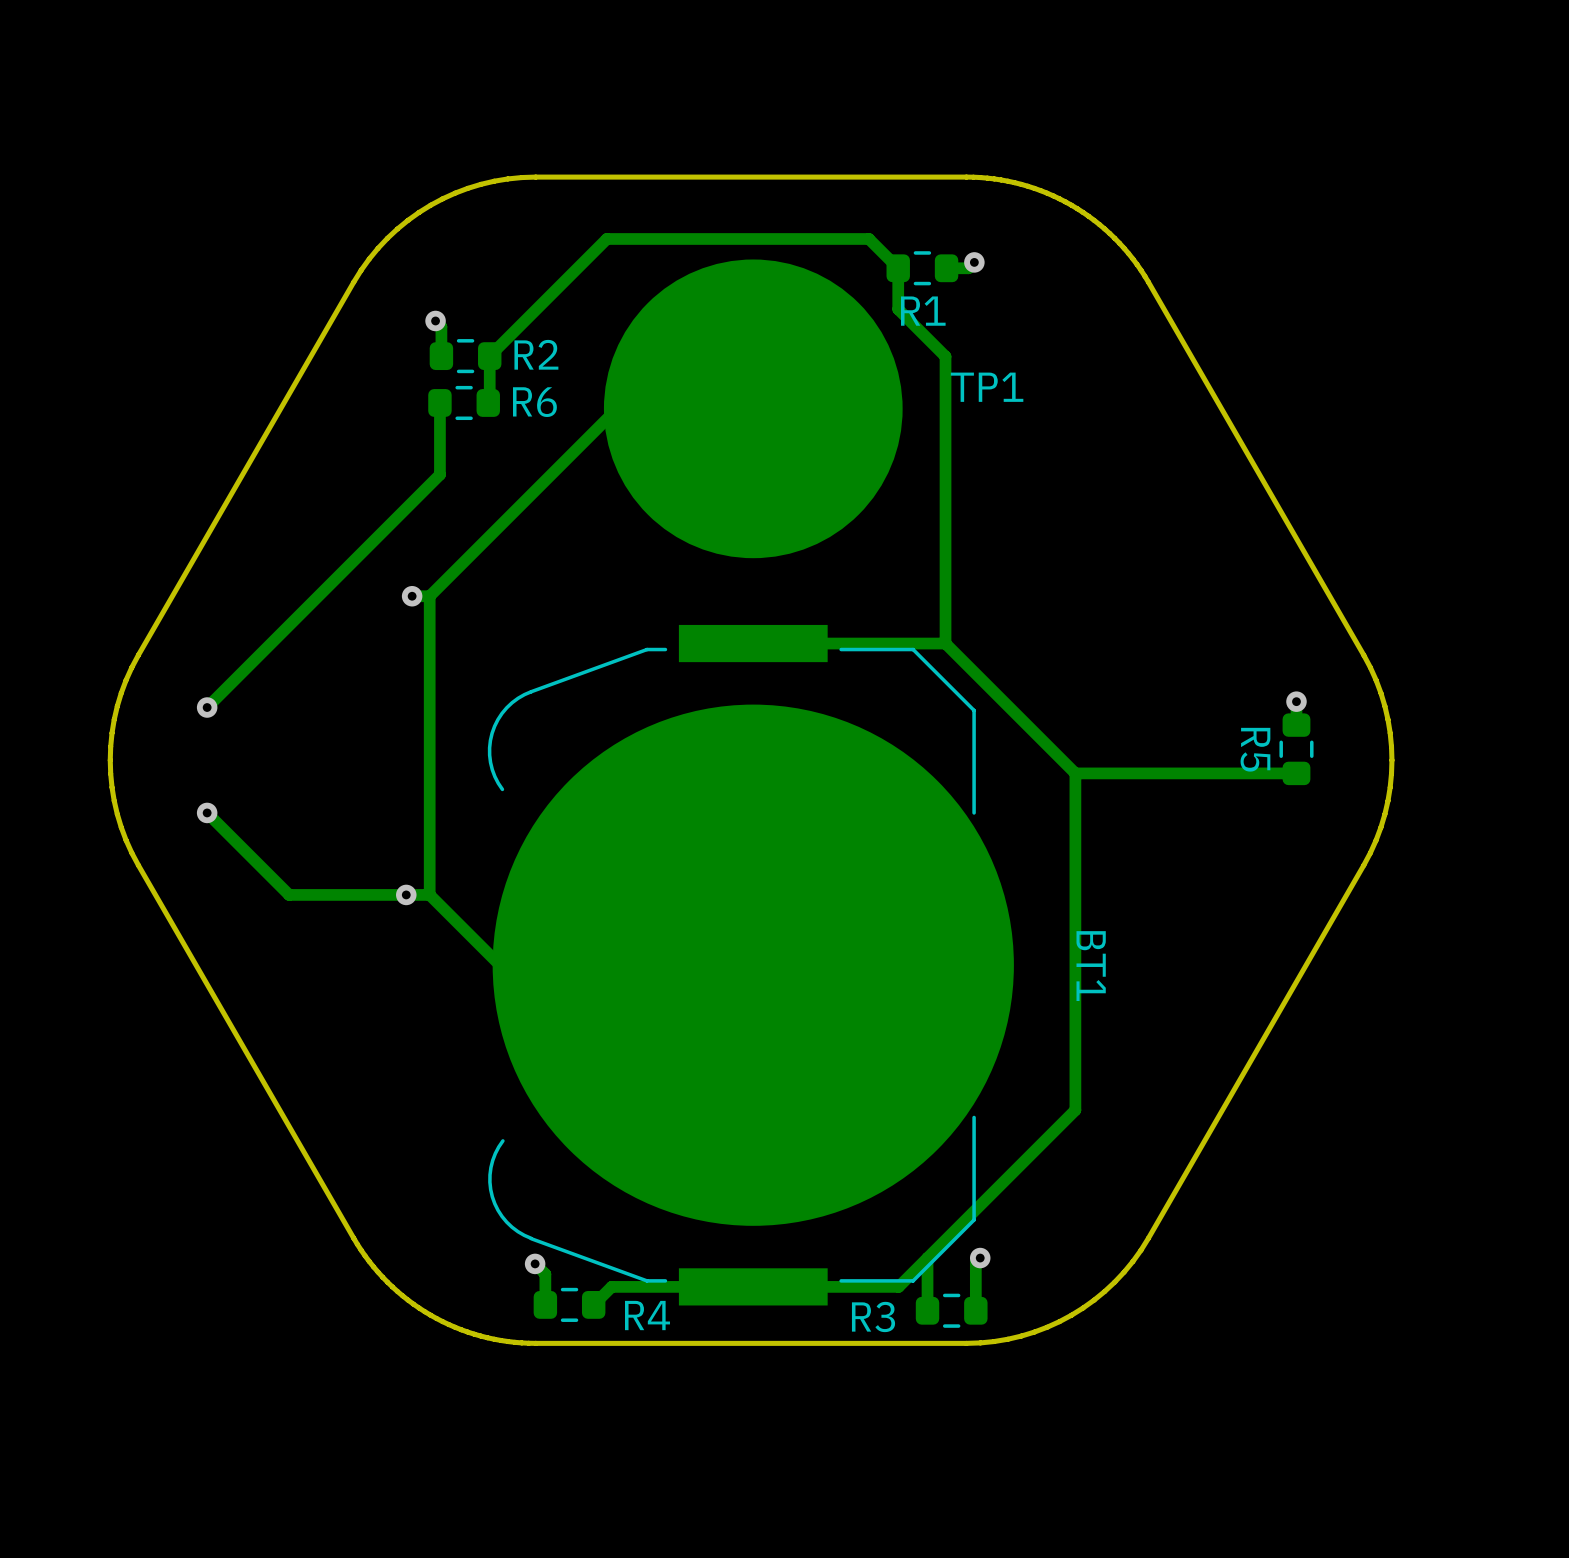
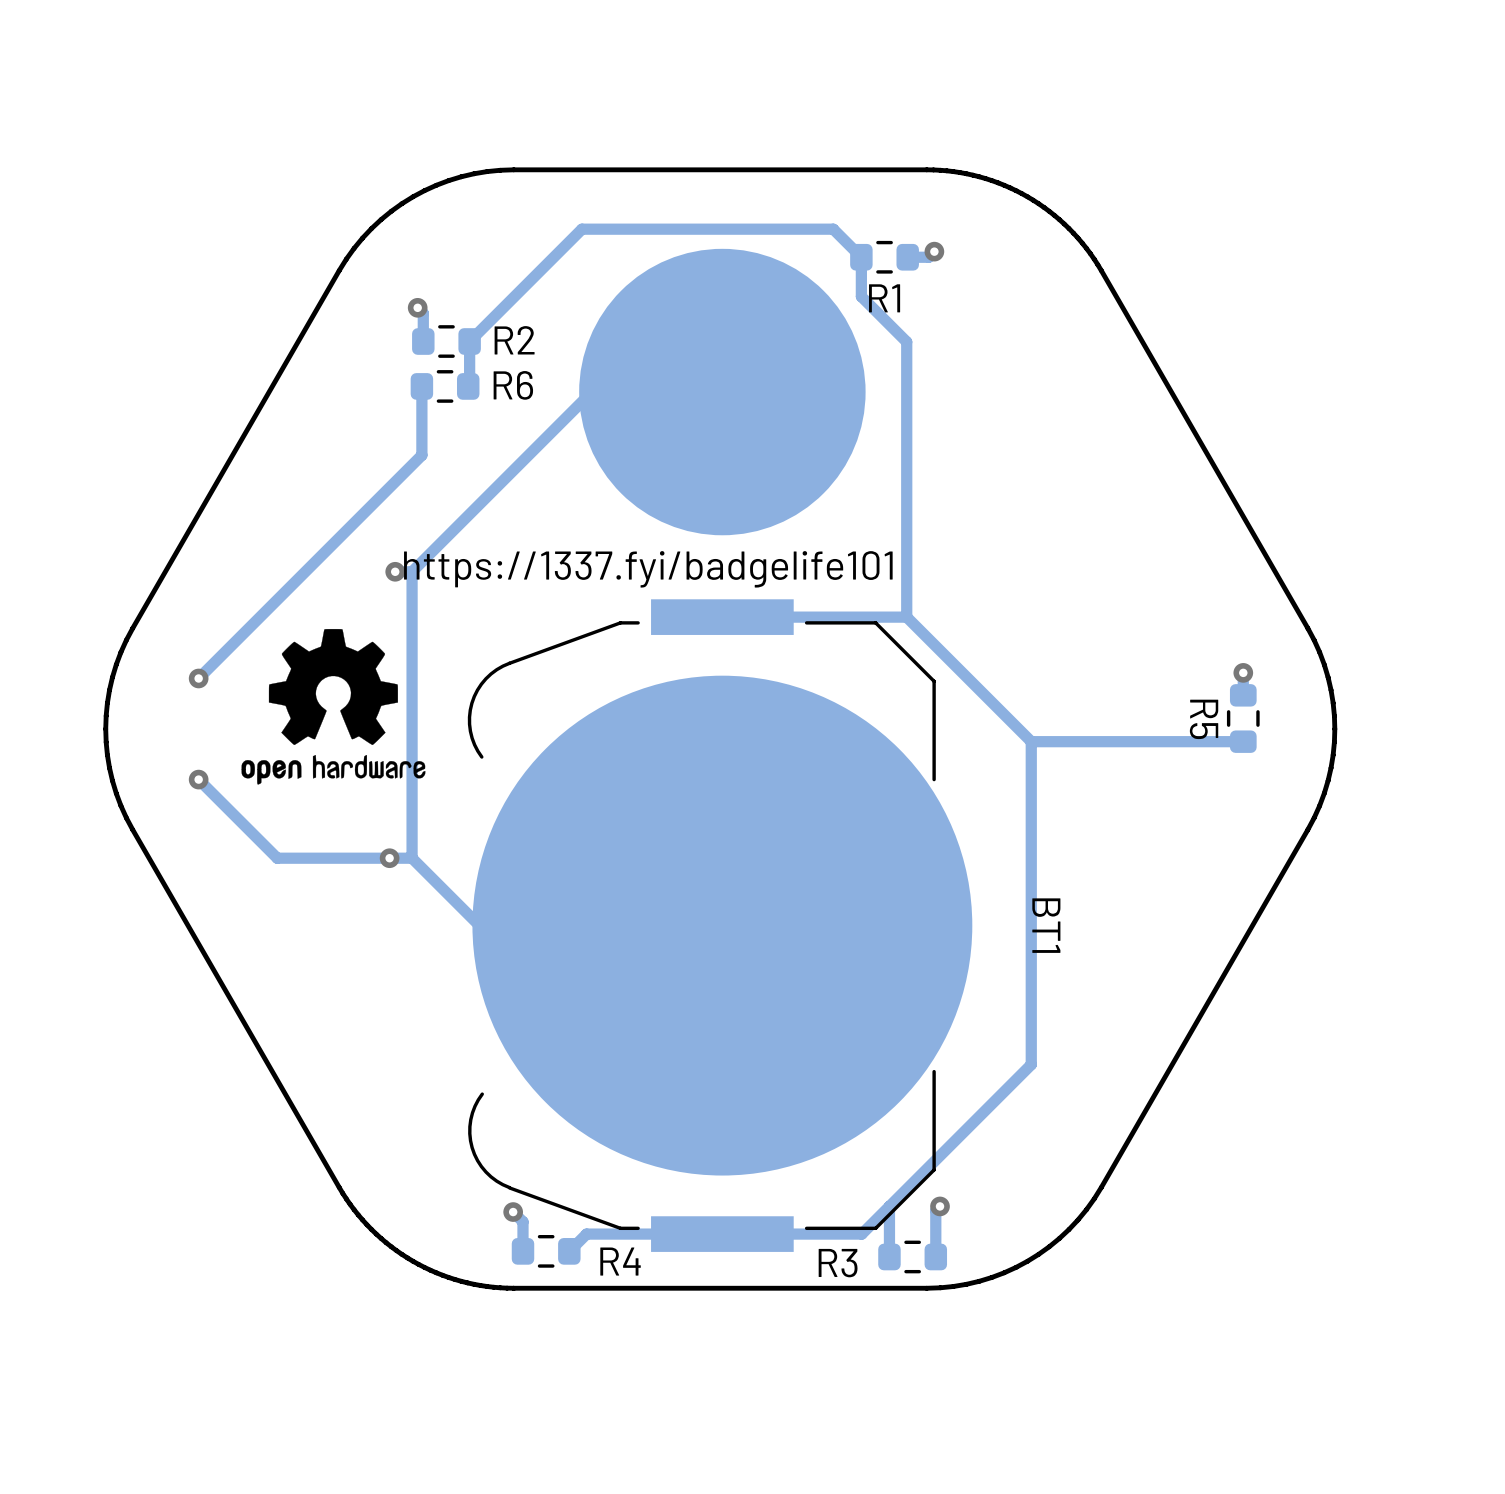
TP1 name: TP1 (987, 387) -> none
text: none -> https://1337.fyi/badgelife101 (648, 569)
drawing: none -> [241, 628, 426, 785]

